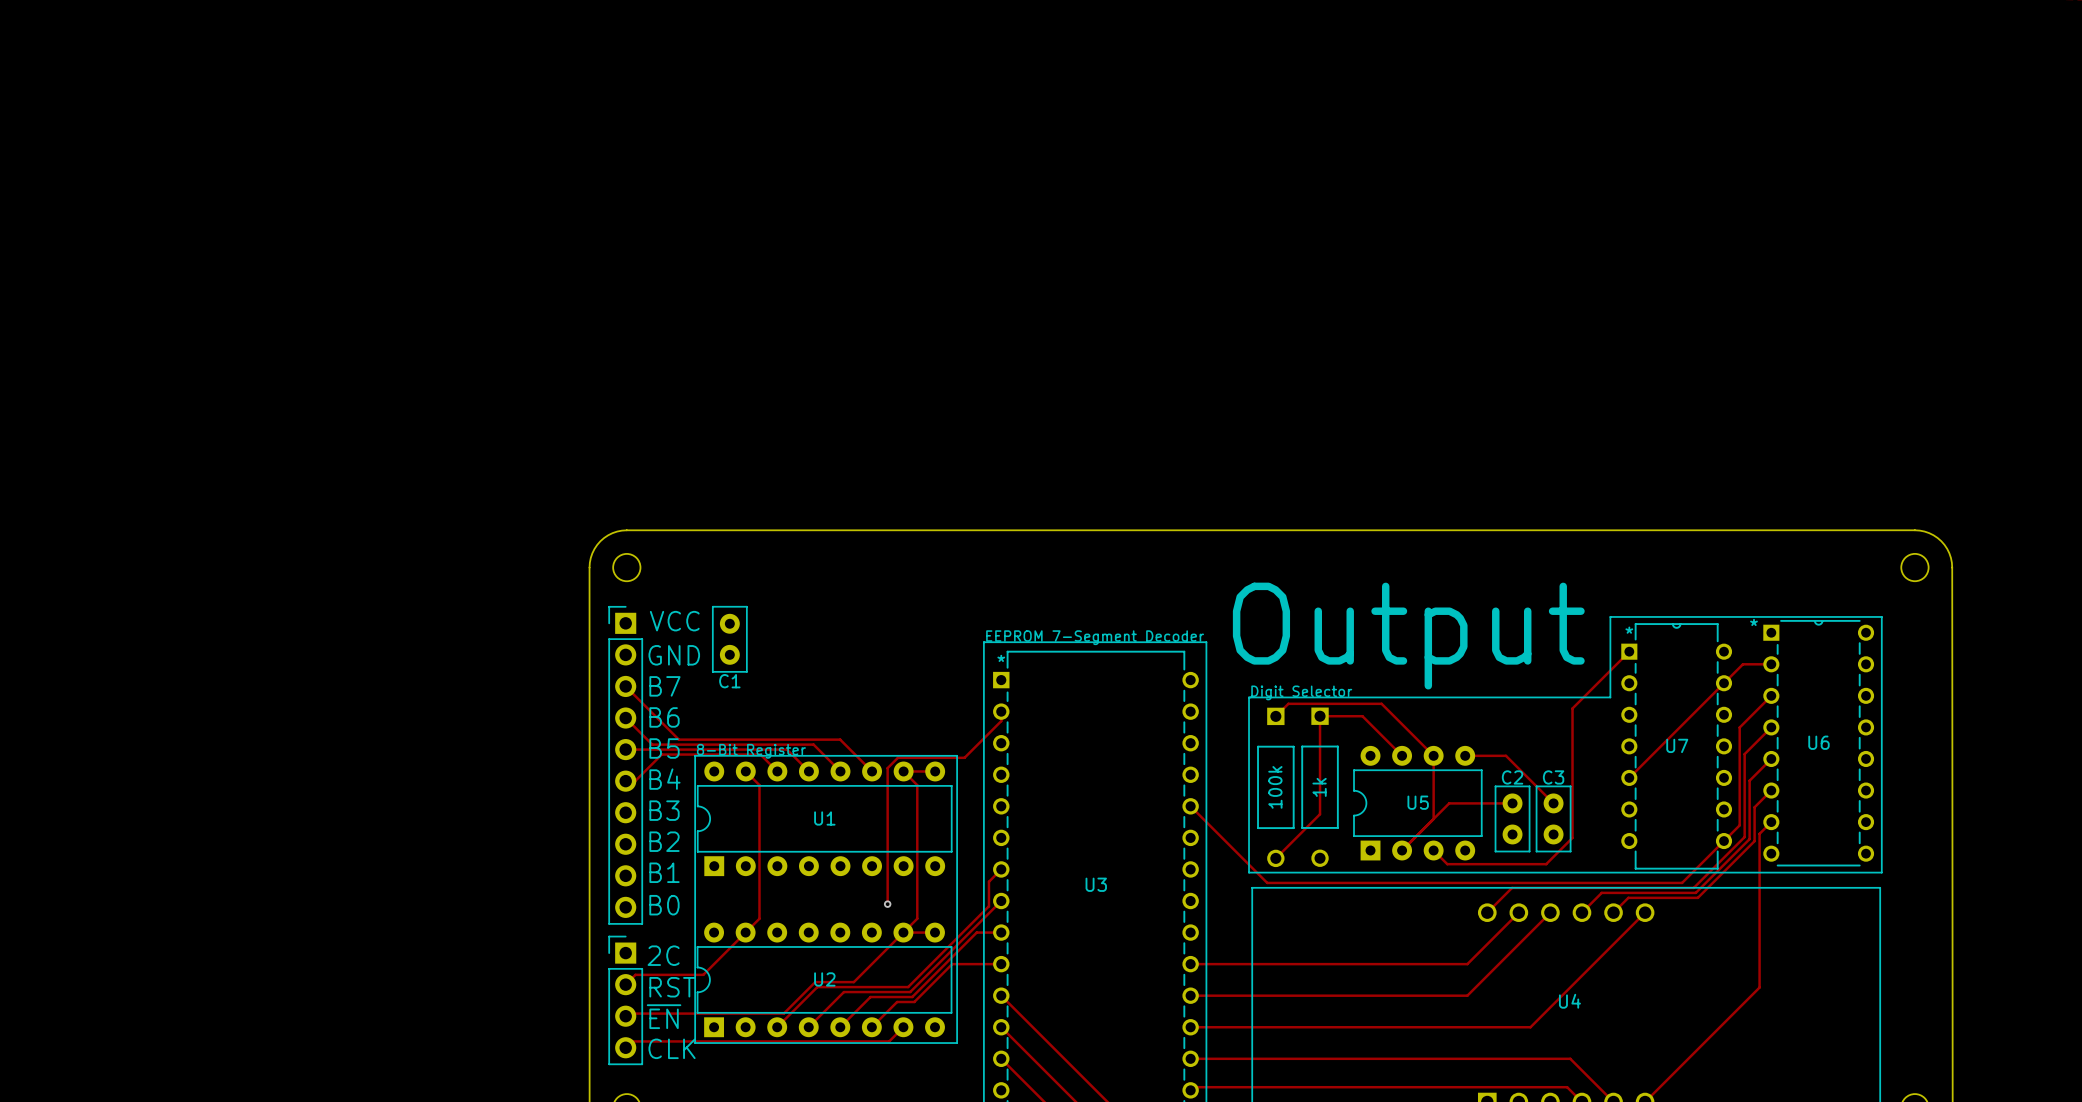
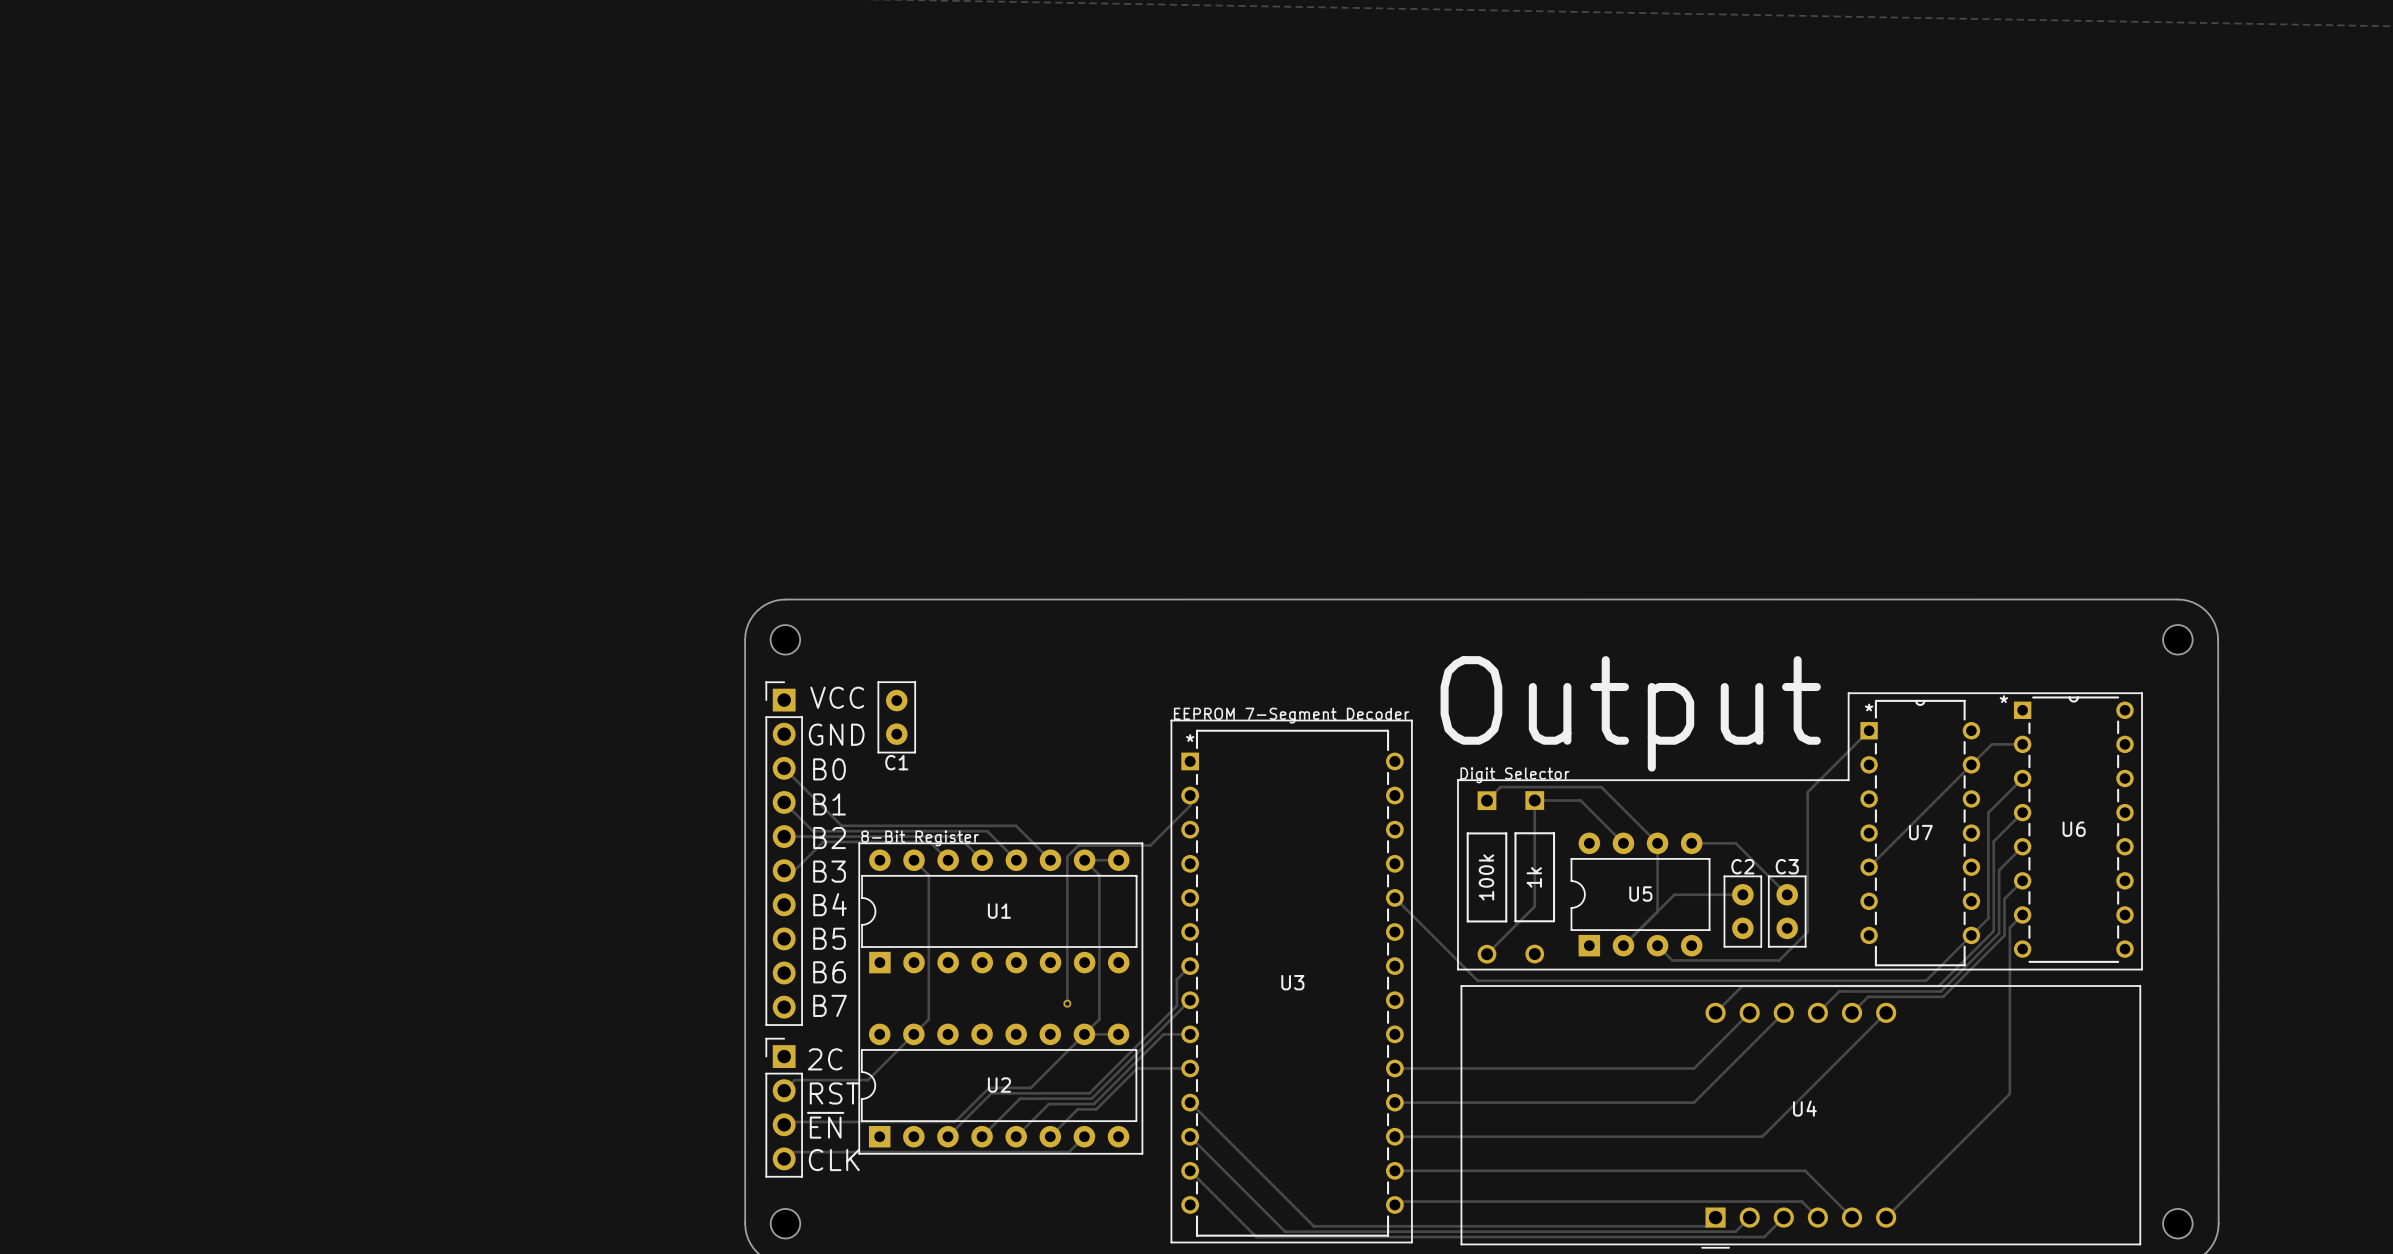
text: B7 (664, 686) -> B0 (829, 769)
text: B6 (664, 717) -> B1 (829, 804)
text: B5 (664, 748) -> B2 (829, 838)
text: B4 (664, 779) -> B3 (829, 871)
text: B3 (664, 810) -> B4 (830, 904)
text: B2 (664, 841) -> B5 (829, 938)
text: B1 (664, 872) -> B6 (829, 972)
text: B0 (664, 905) -> B7 (830, 1005)

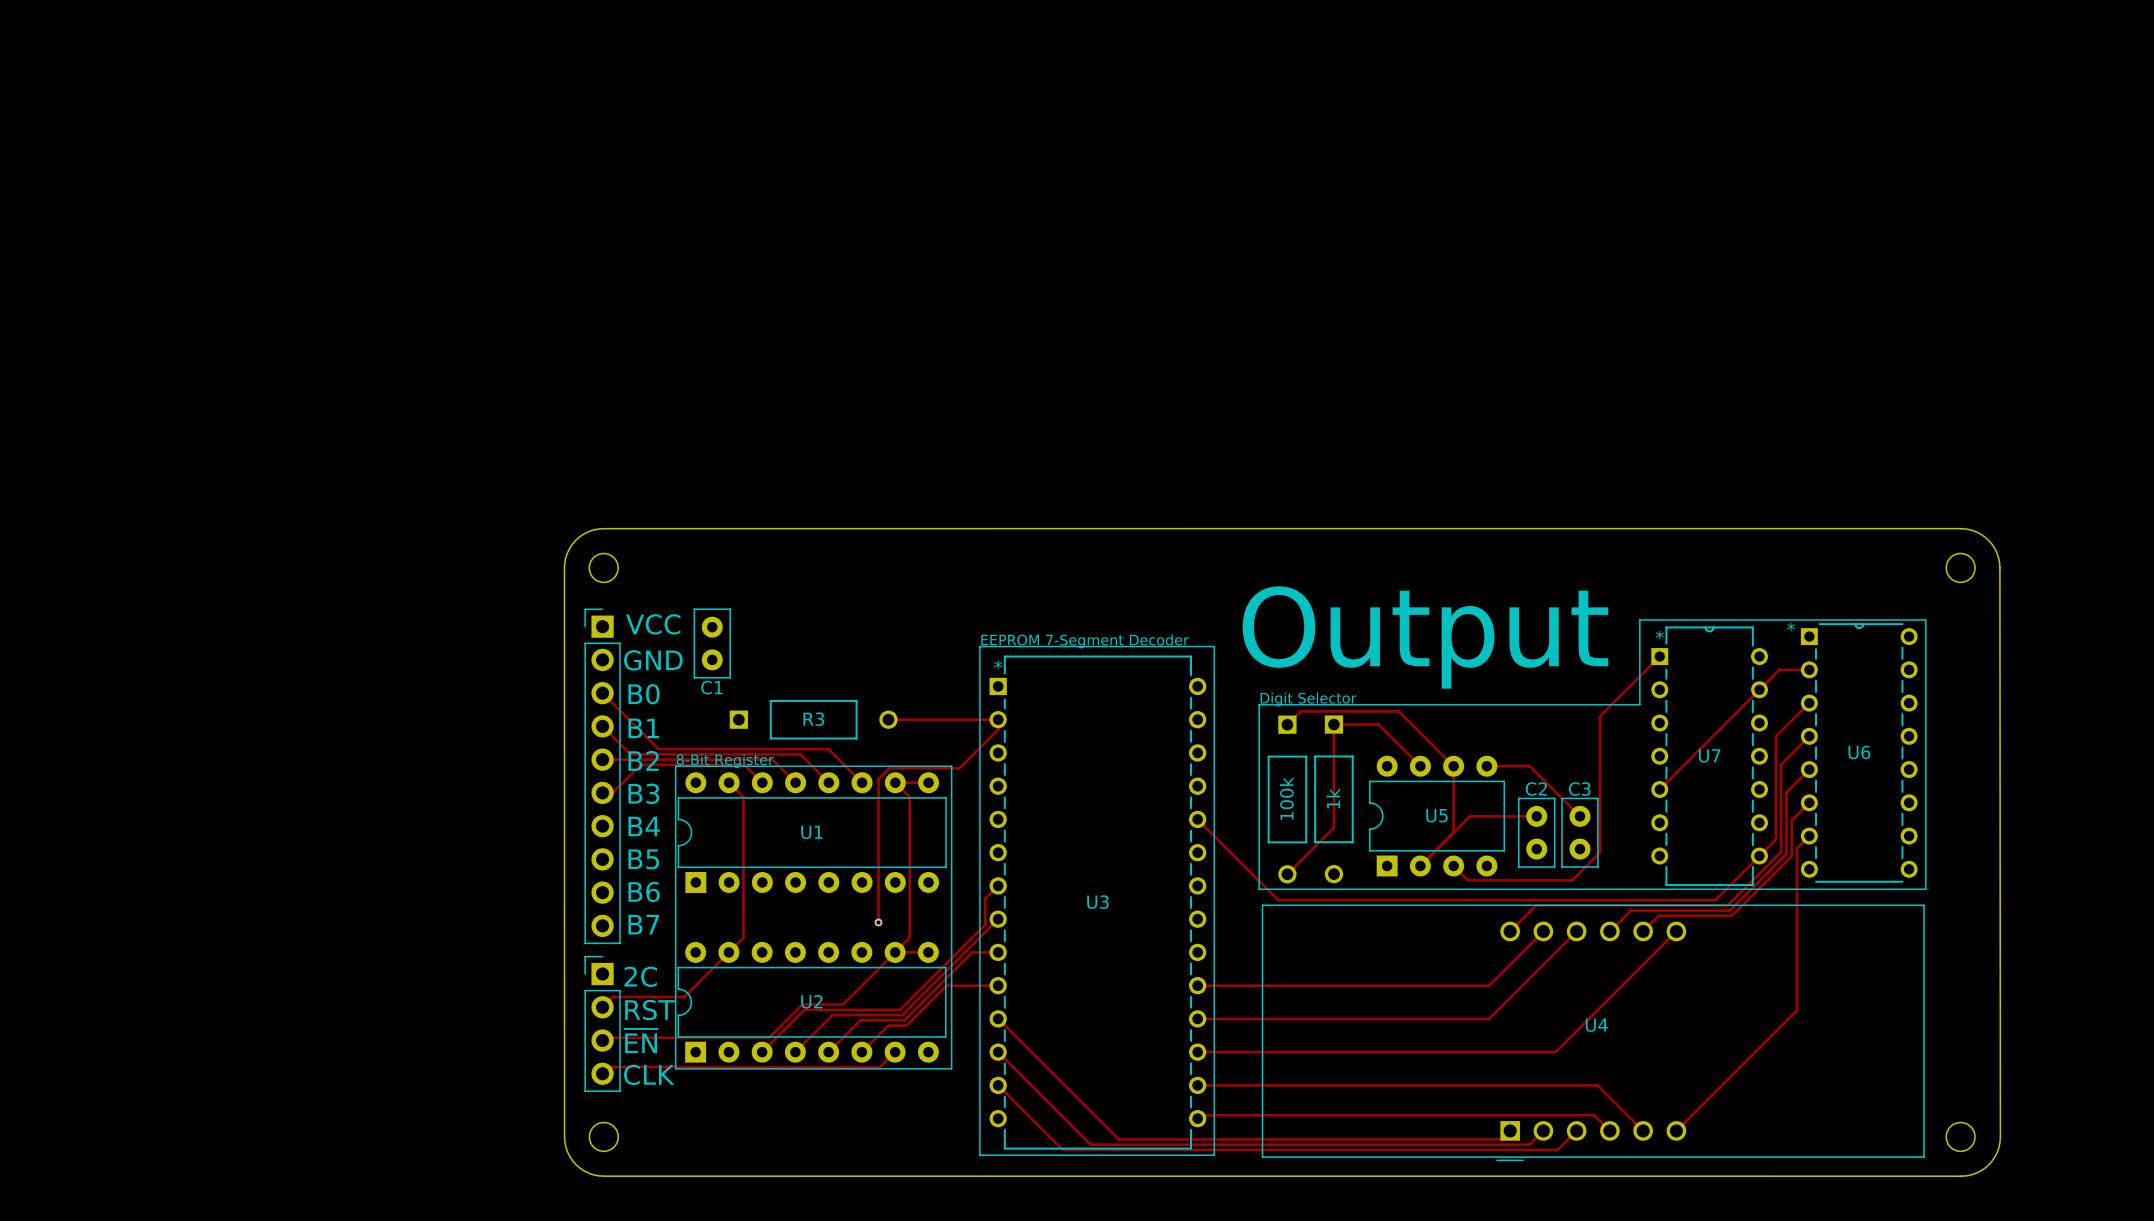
R3: none -> (813, 719)
track: none -> (888, 719) (998, 719)

